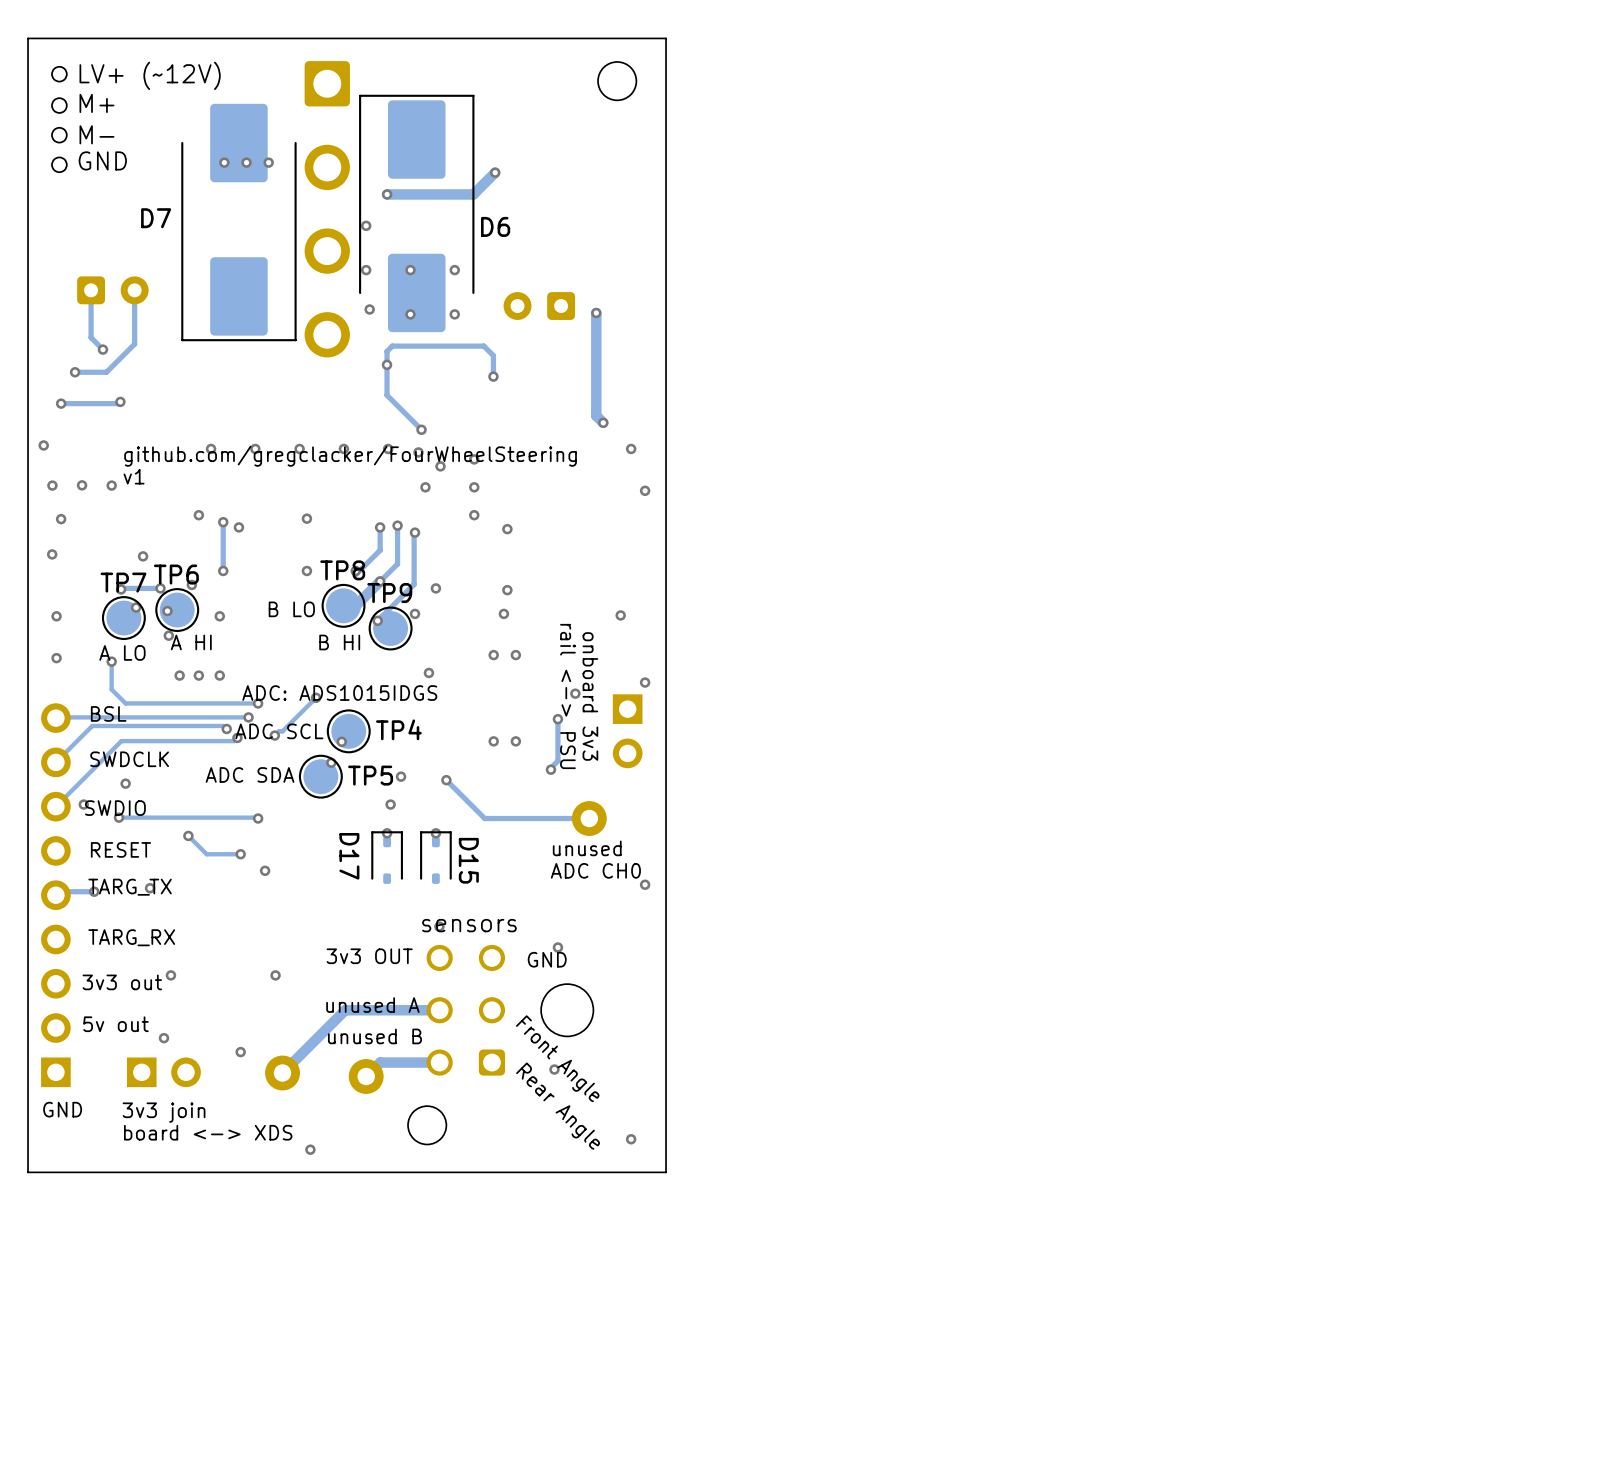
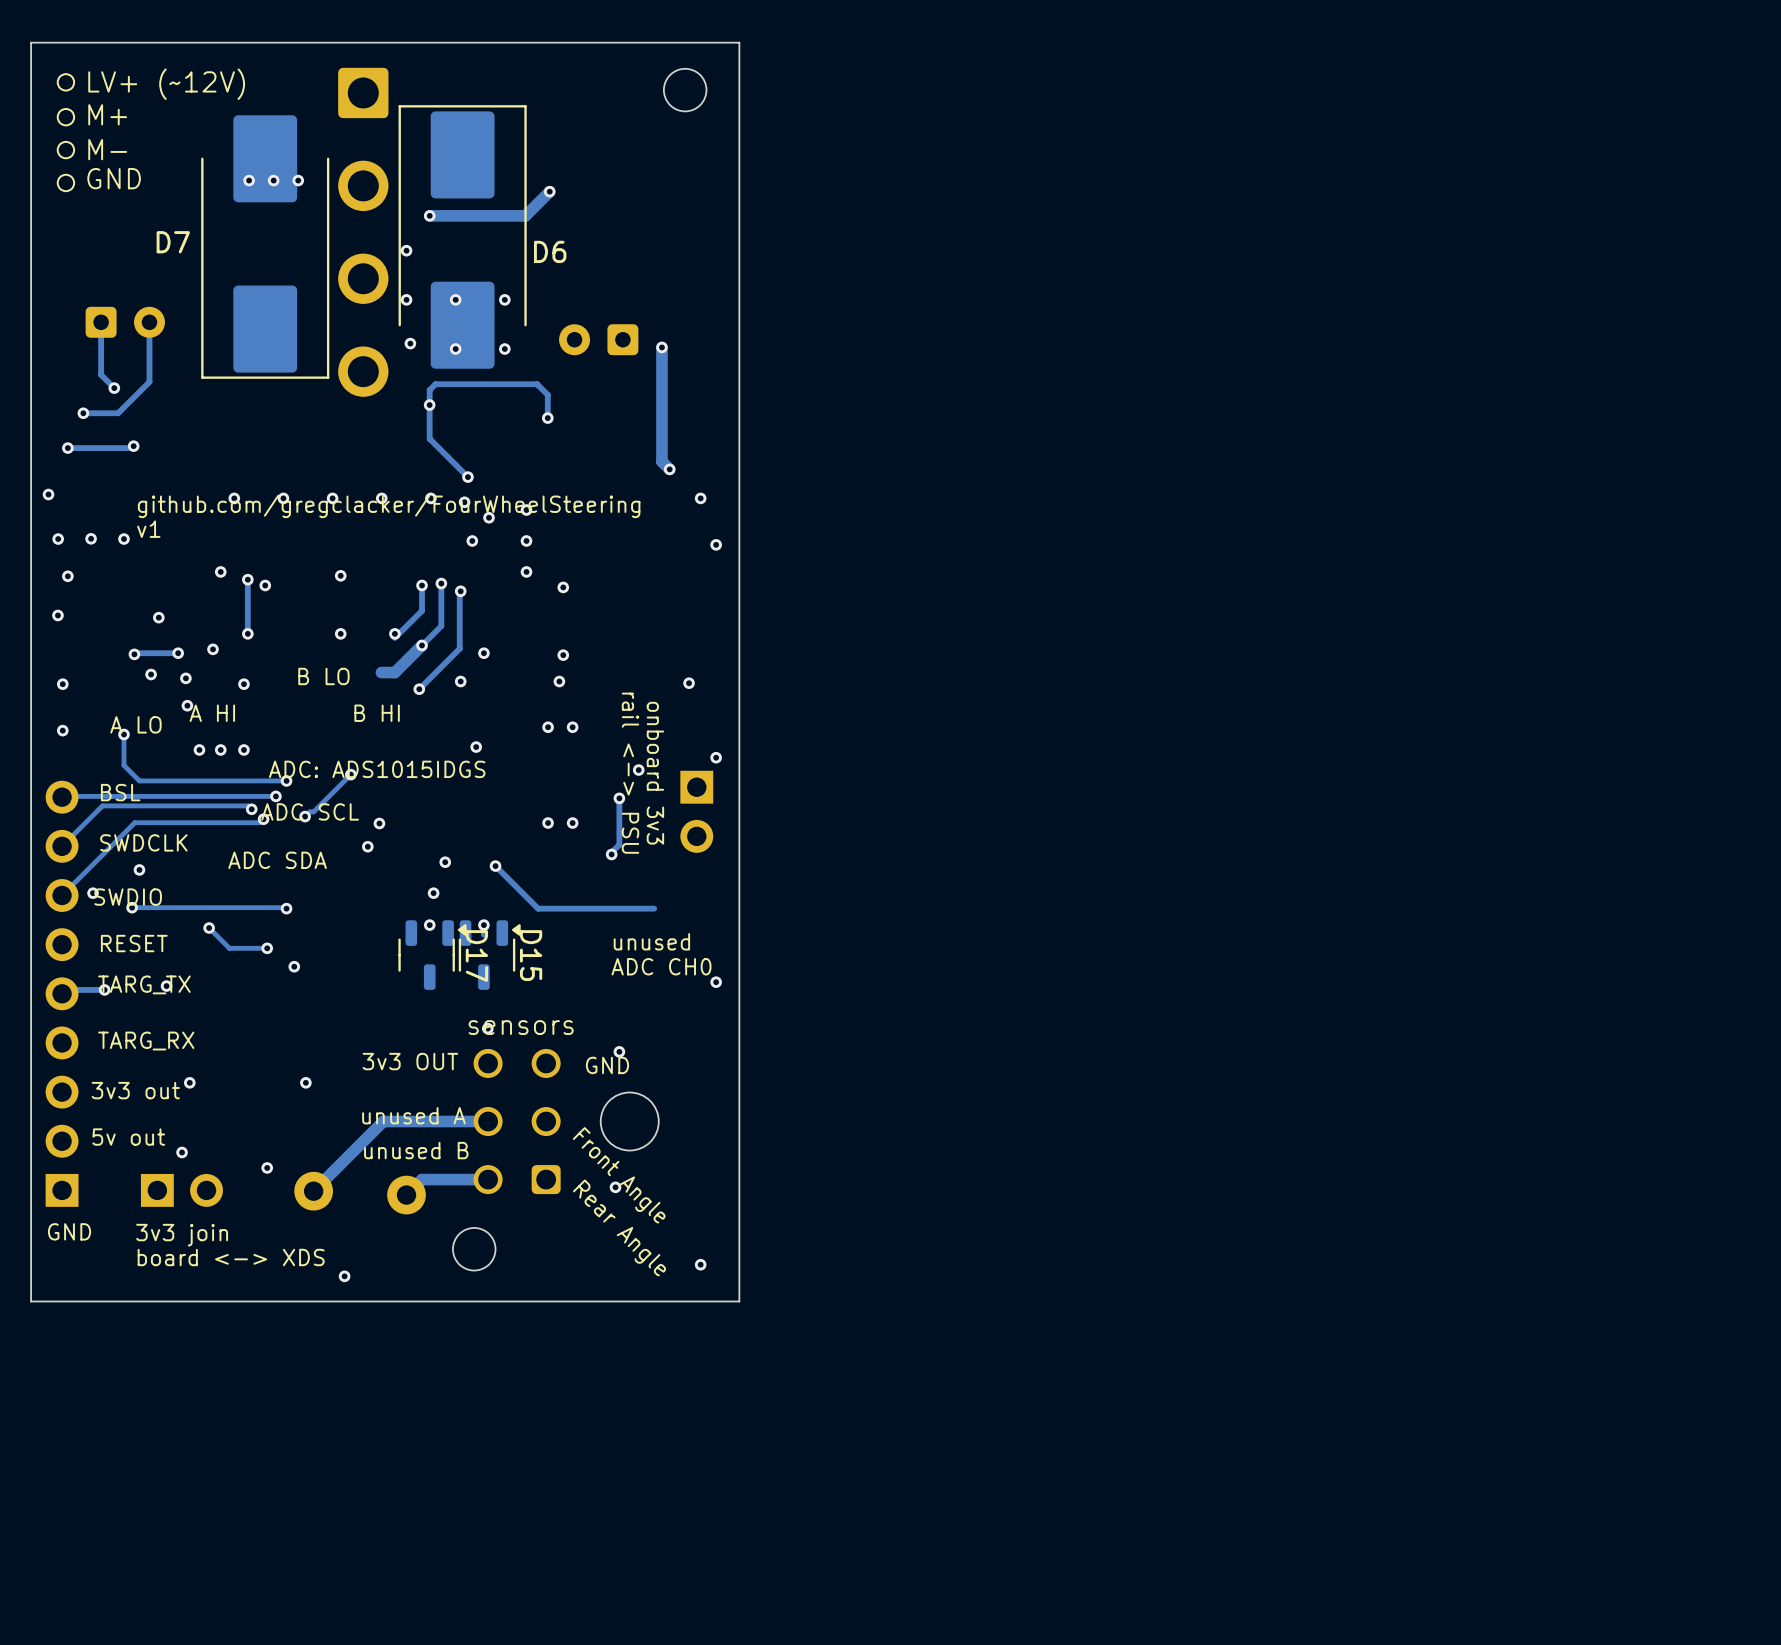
TP8: (343, 605) -> none
TP6: (177, 610) -> none
TP7: (123, 618) -> none
TP9: (390, 628) -> none
TP4: (348, 731) -> none
TP5: (320, 776) -> none
part: (589, 818) -> none
D17 footprint: [371, 831, 403, 884] -> [398, 920, 467, 990]
D15 footprint: [420, 831, 452, 884] -> [452, 920, 521, 990]
D17 name position: D17 (349, 856) -> D17 (476, 956)

